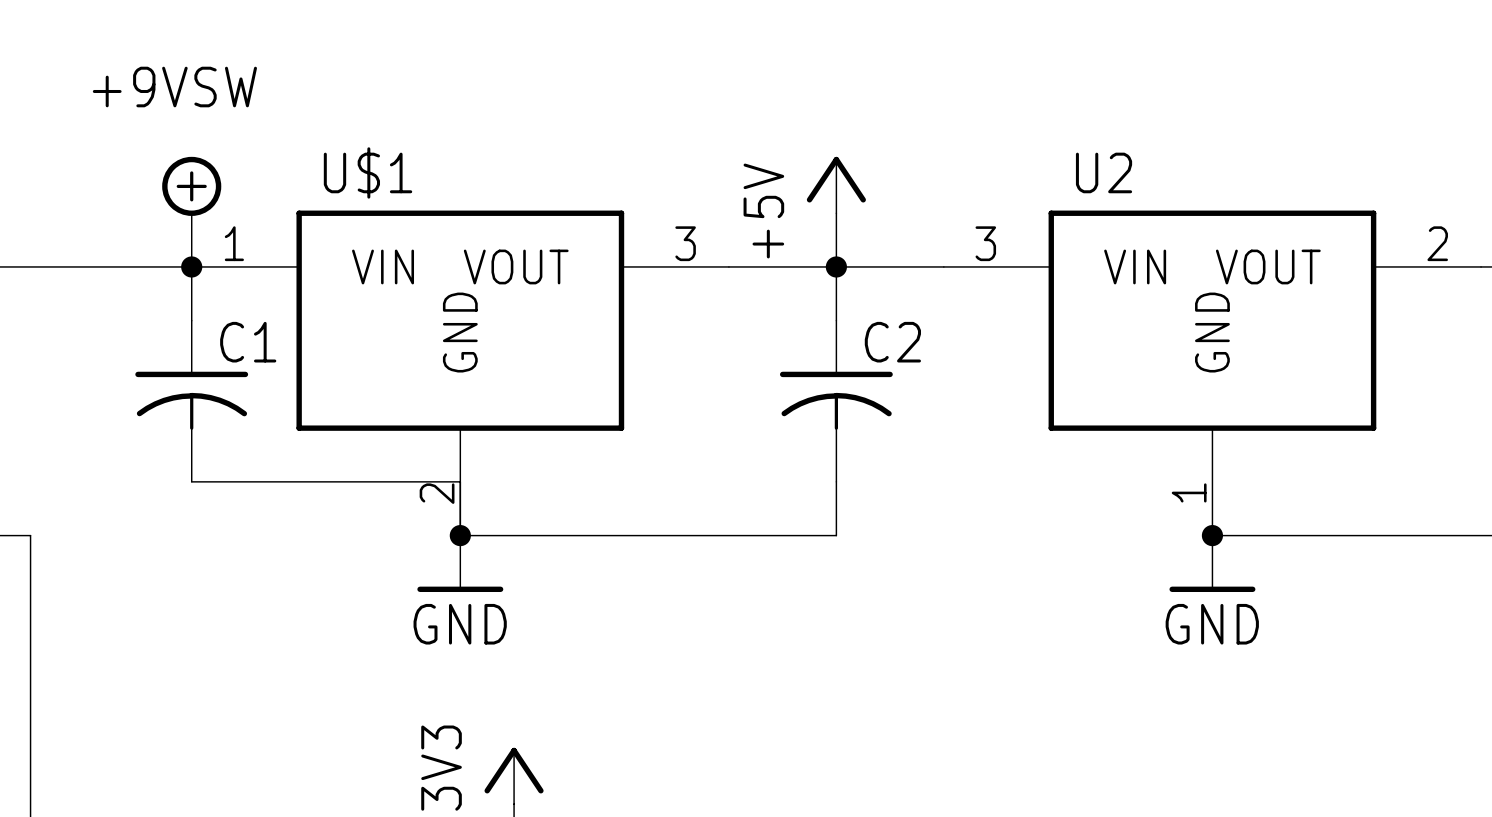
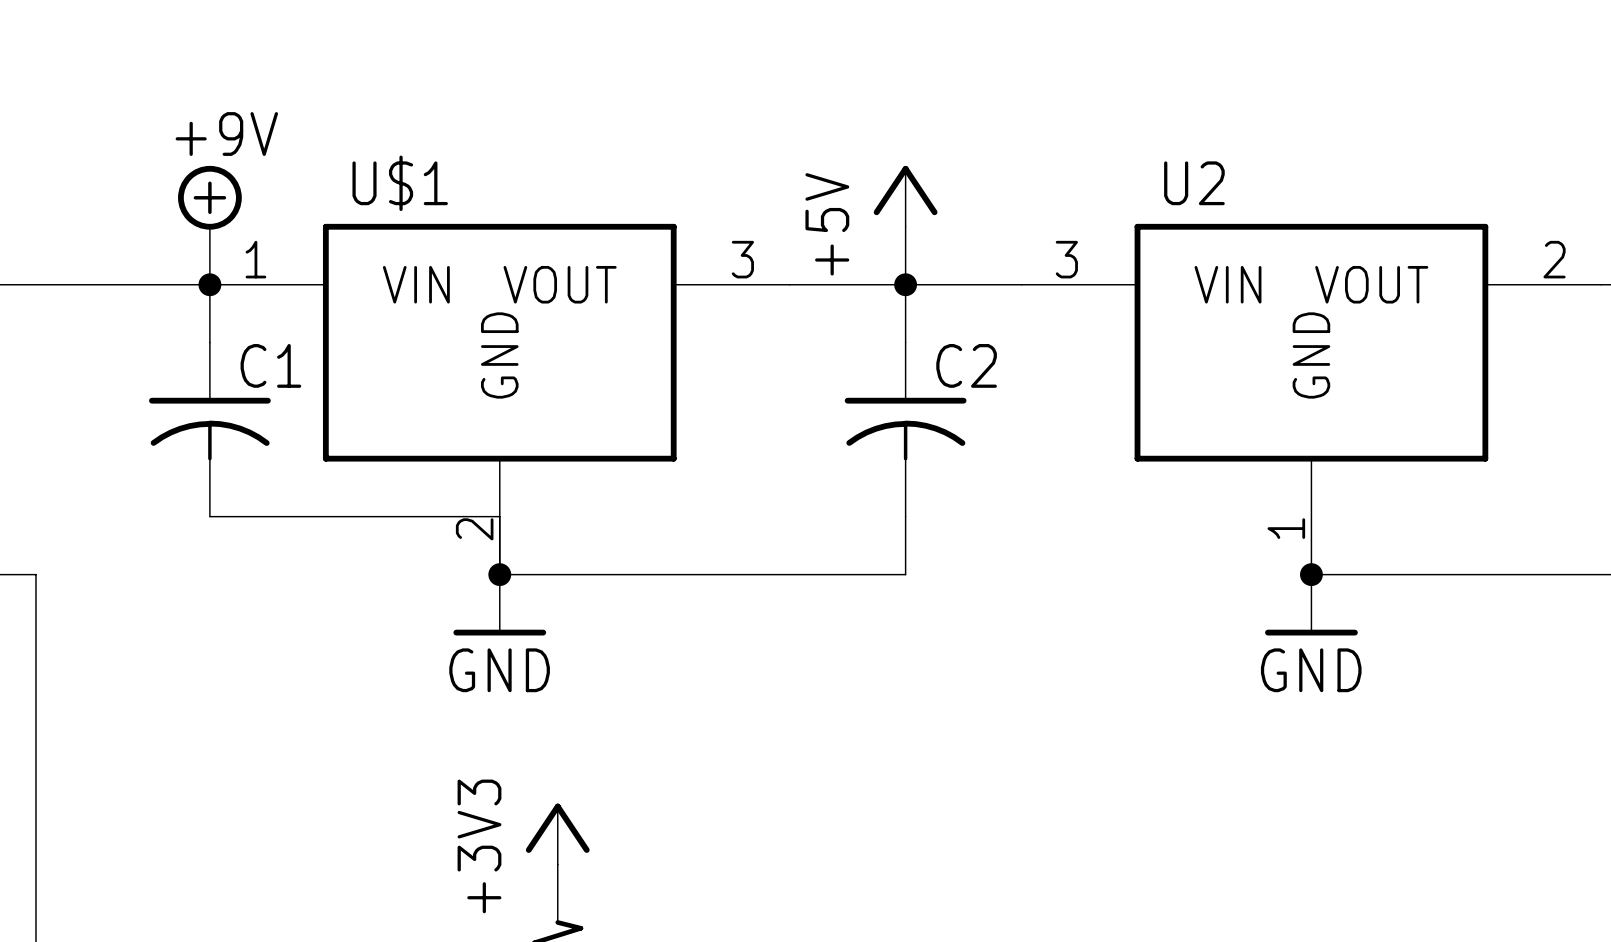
label: +9VSW (174, 87) -> none
power symbol text: none -> +9V (226, 134)

